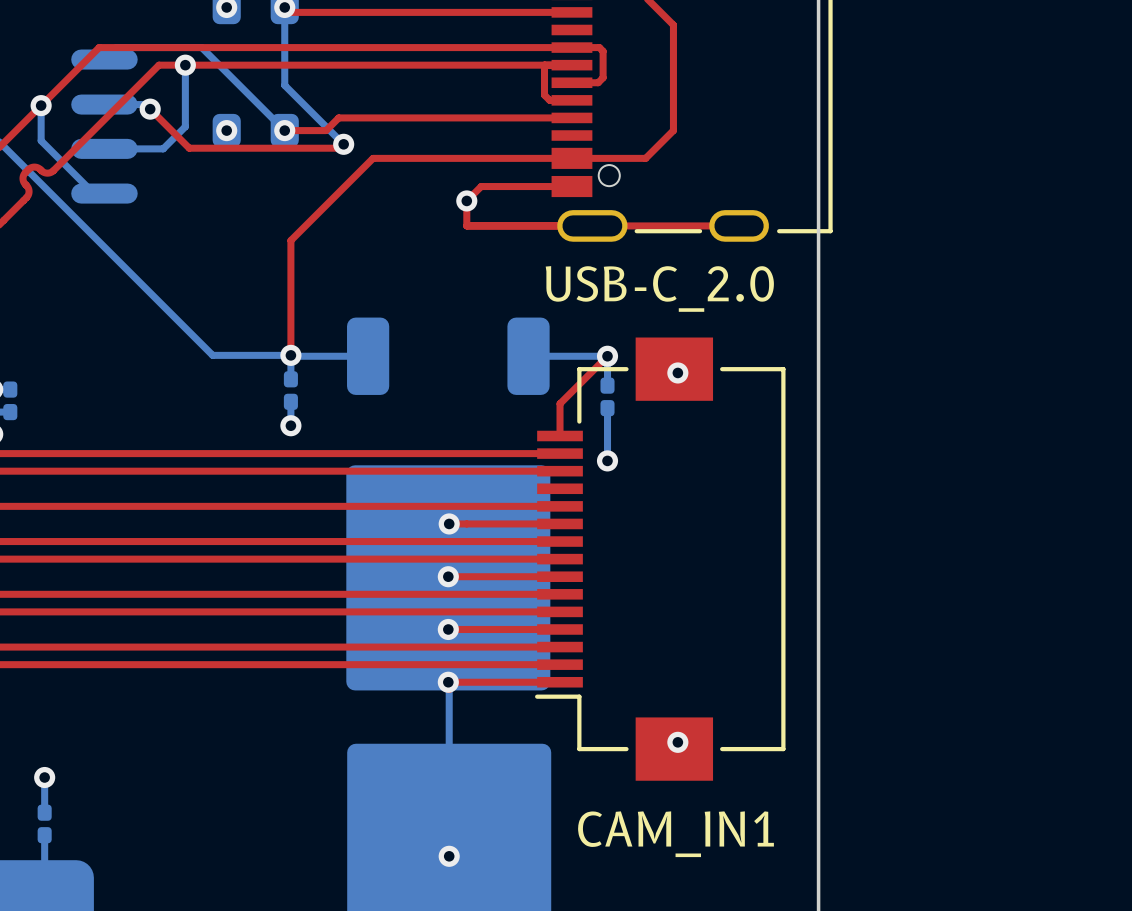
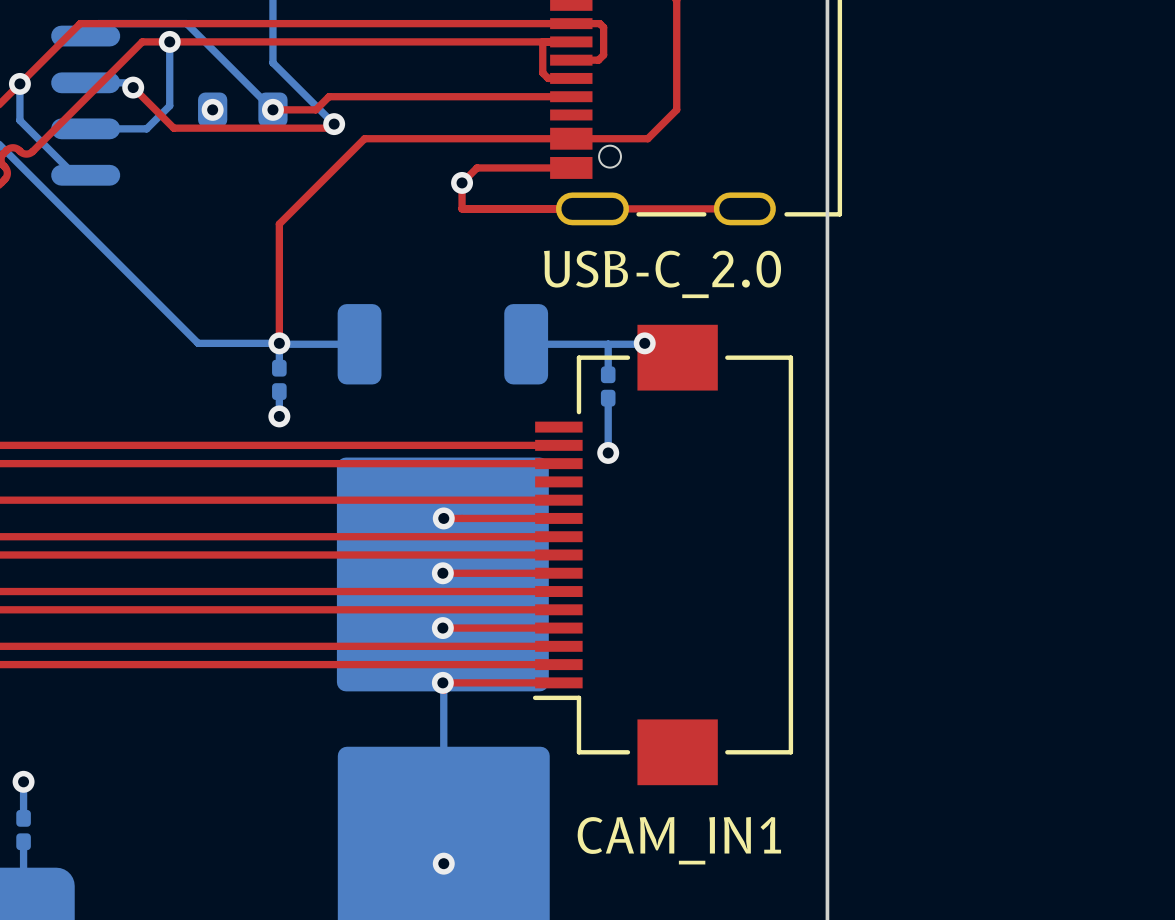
bottom track: none -> (644, 343) (608, 344)
via: none -> (644, 343)
top track: (607, 356) (560, 403) (560, 436) -> none
via: (607, 356) -> none
via: (677, 372) -> none
via: (677, 742) -> none

